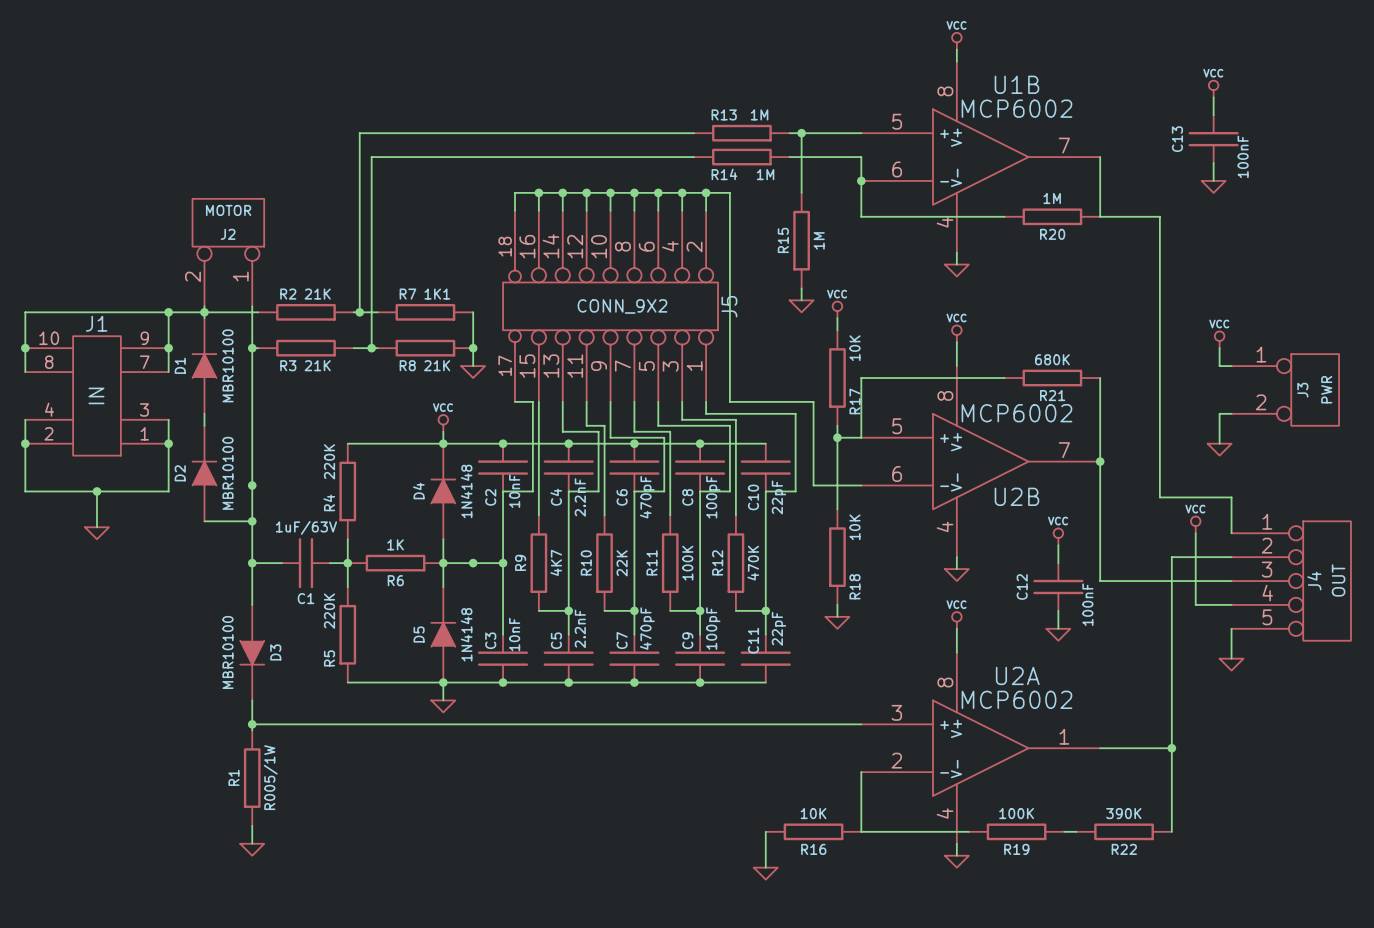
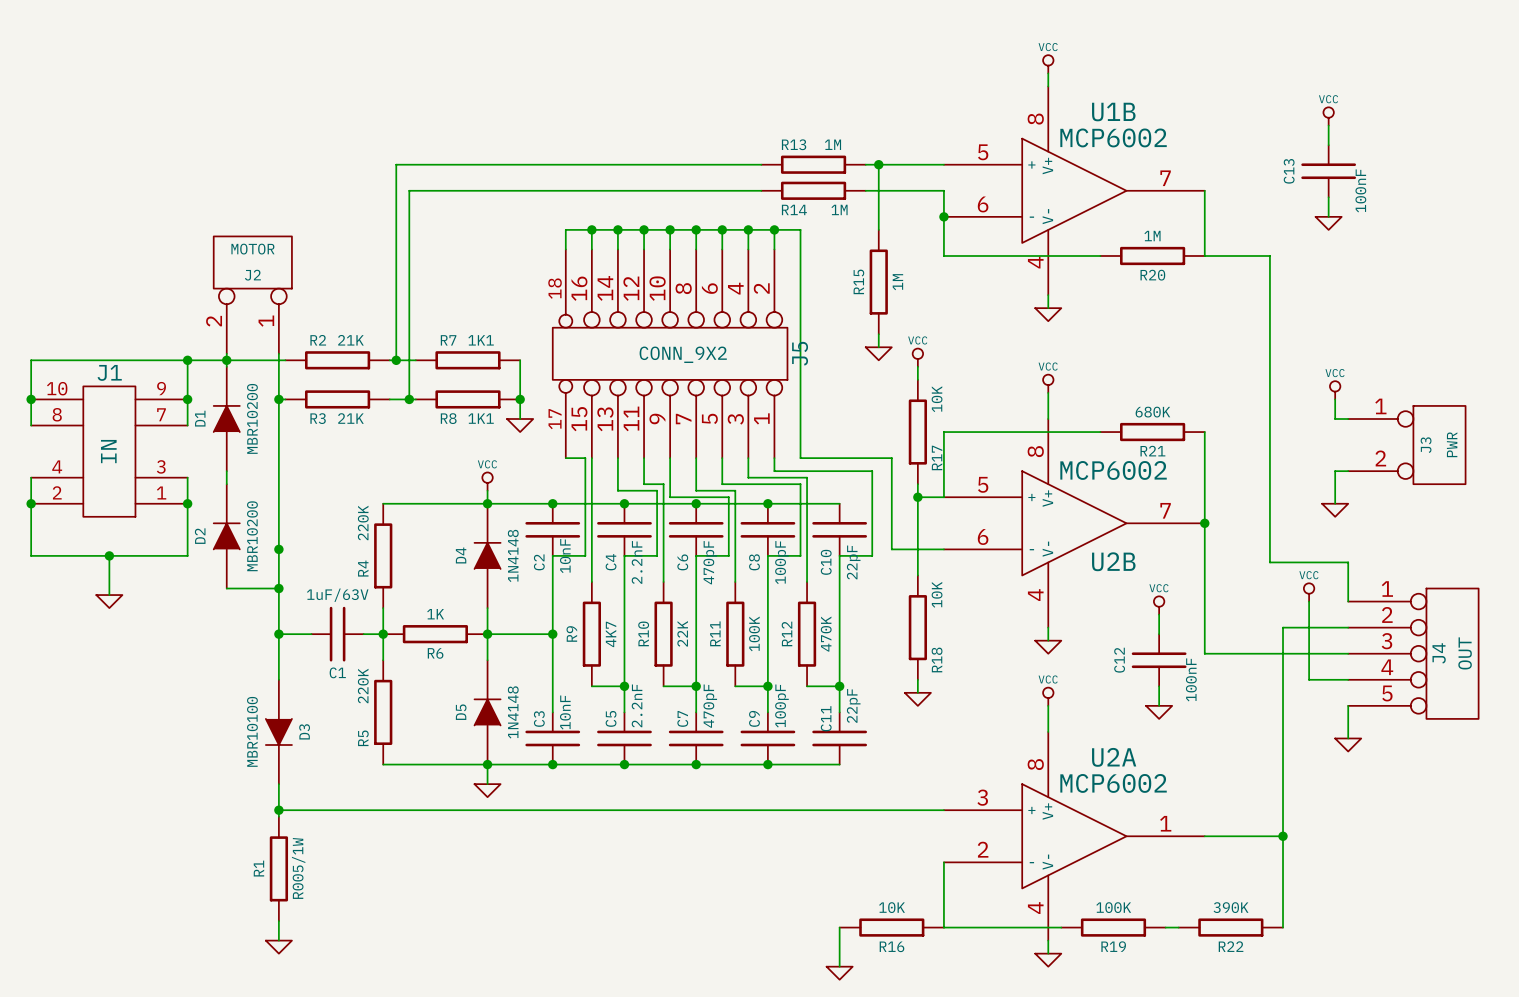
D1 value: MBR10100 (228, 365) -> MBR10200 (252, 418)
R8 value: 21K (437, 365) -> 1K1 (481, 418)
D2 value: MBR10100 (228, 473) -> MBR10200 (252, 536)
junction: (473, 563) -> none

